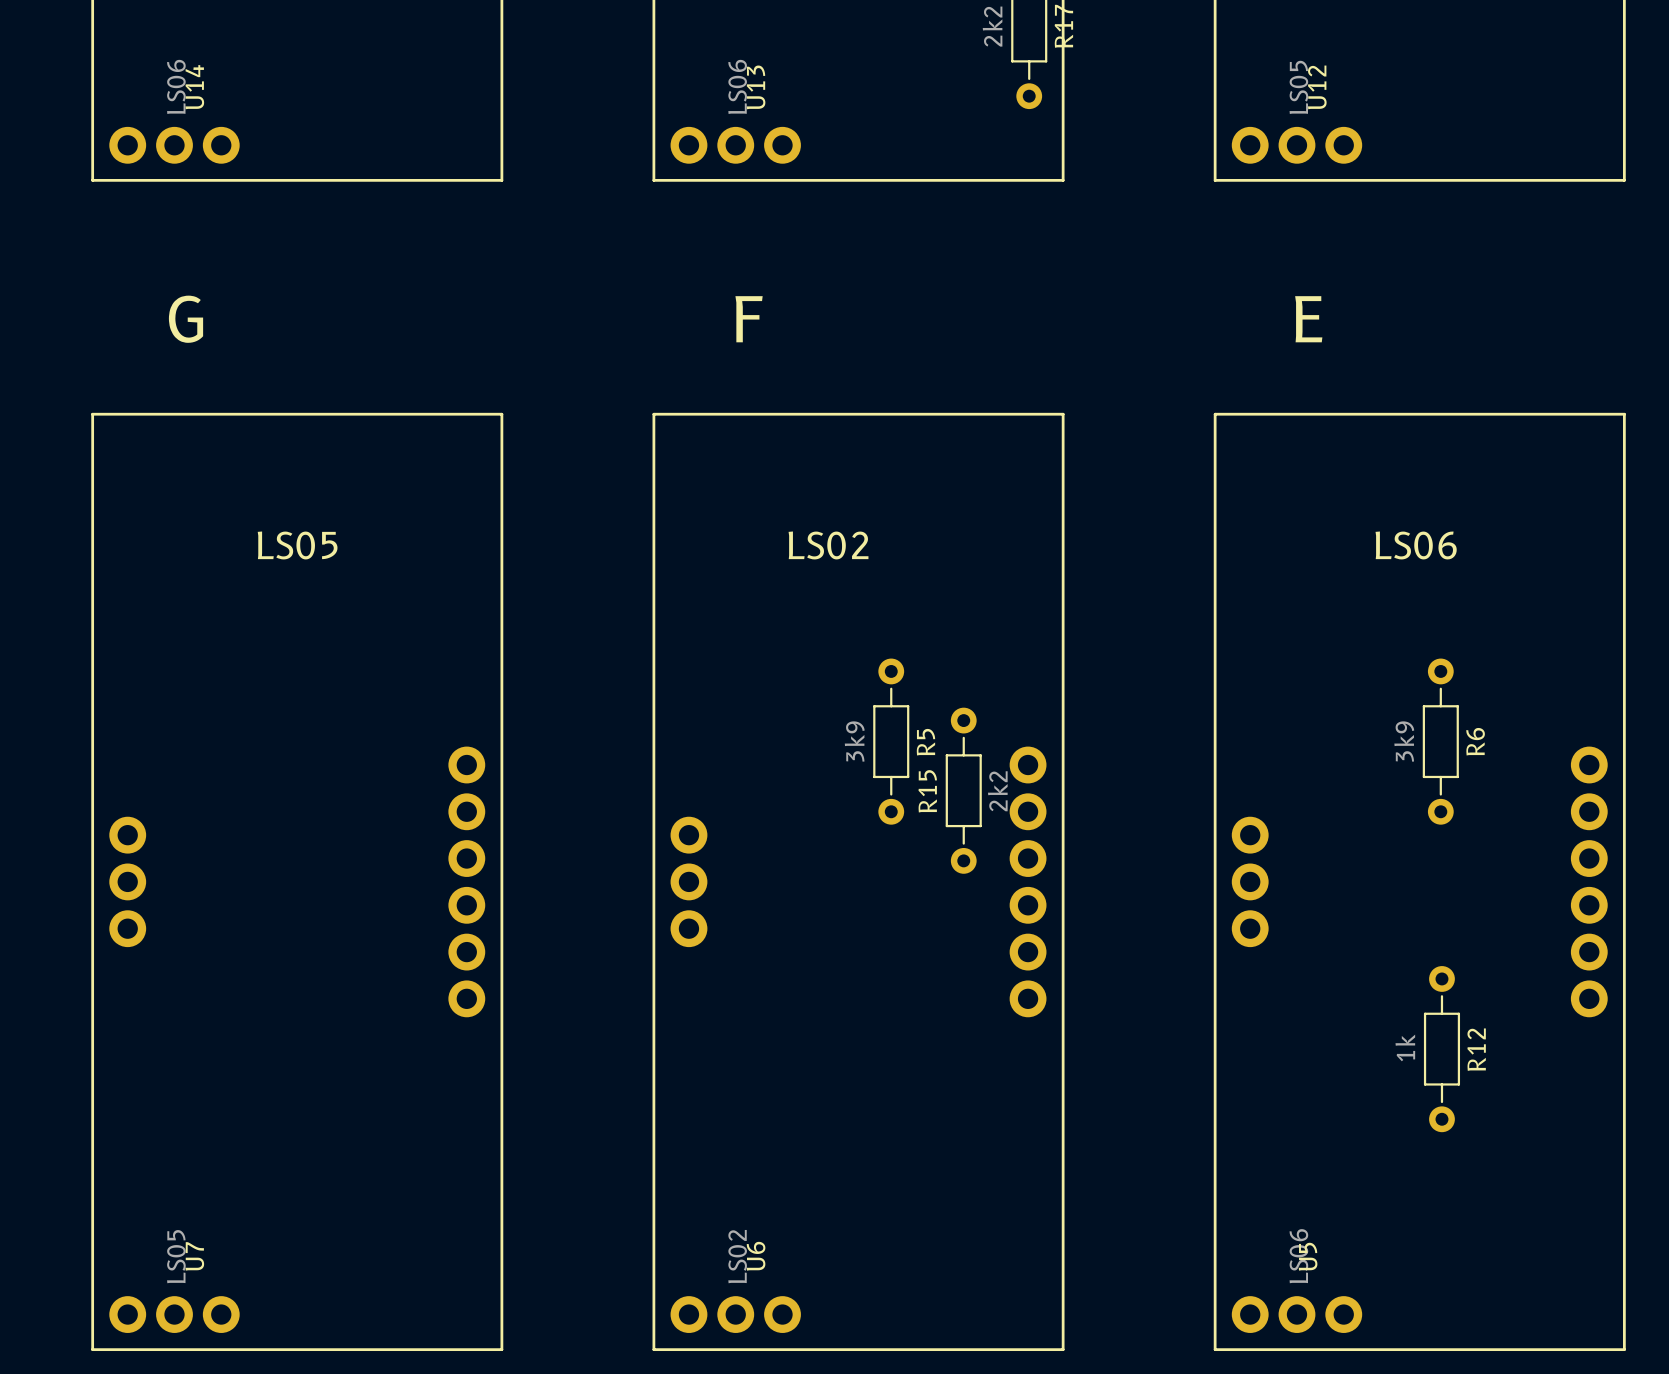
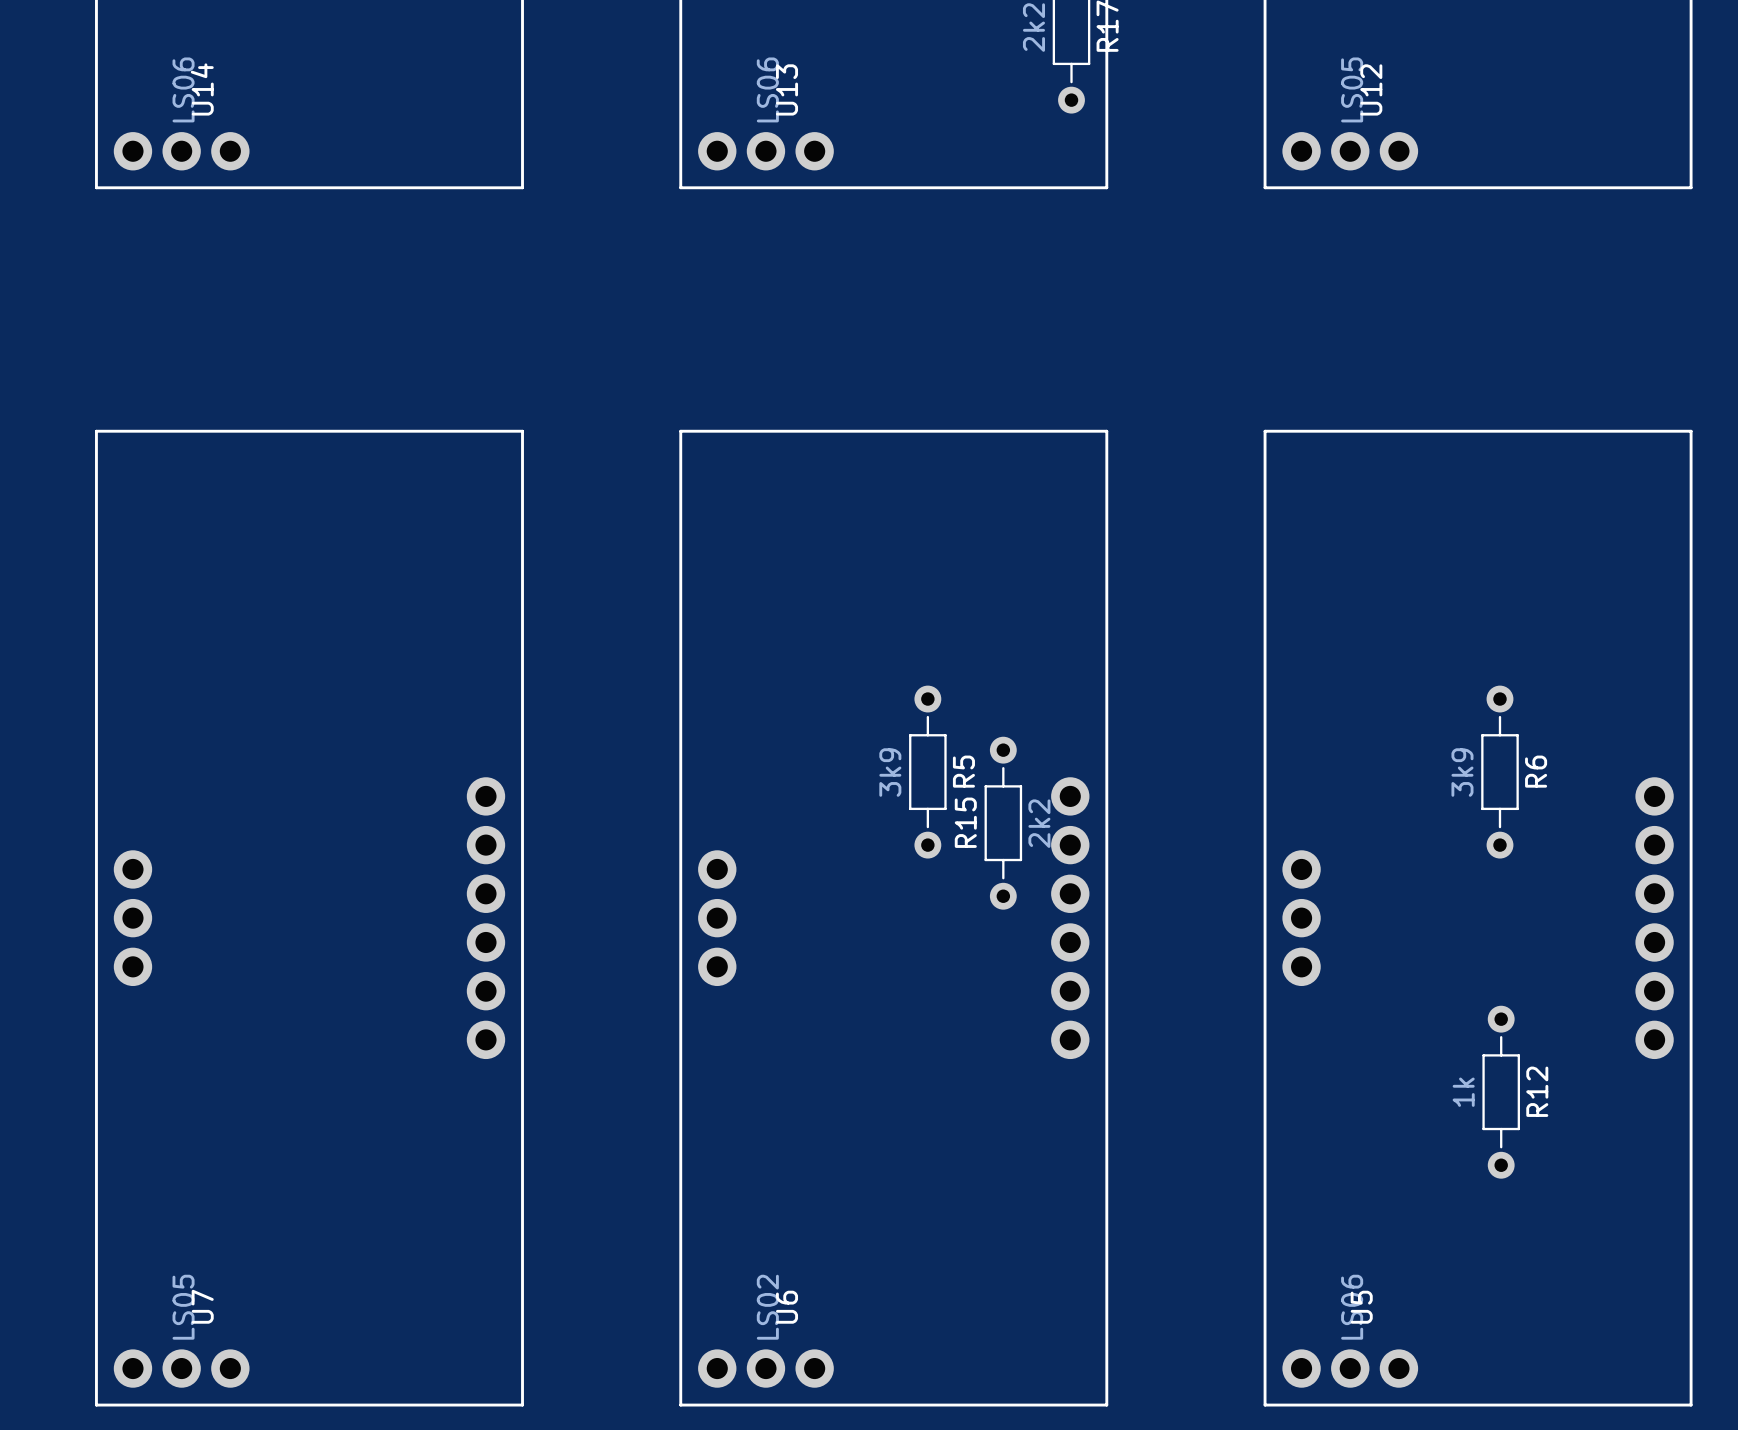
text: G (186, 319) -> none
text: F (749, 319) -> none
text: E (1308, 319) -> none
text: LS05 (297, 545) -> none
text: LS02 (828, 545) -> none
text: LS06 (1416, 545) -> none

